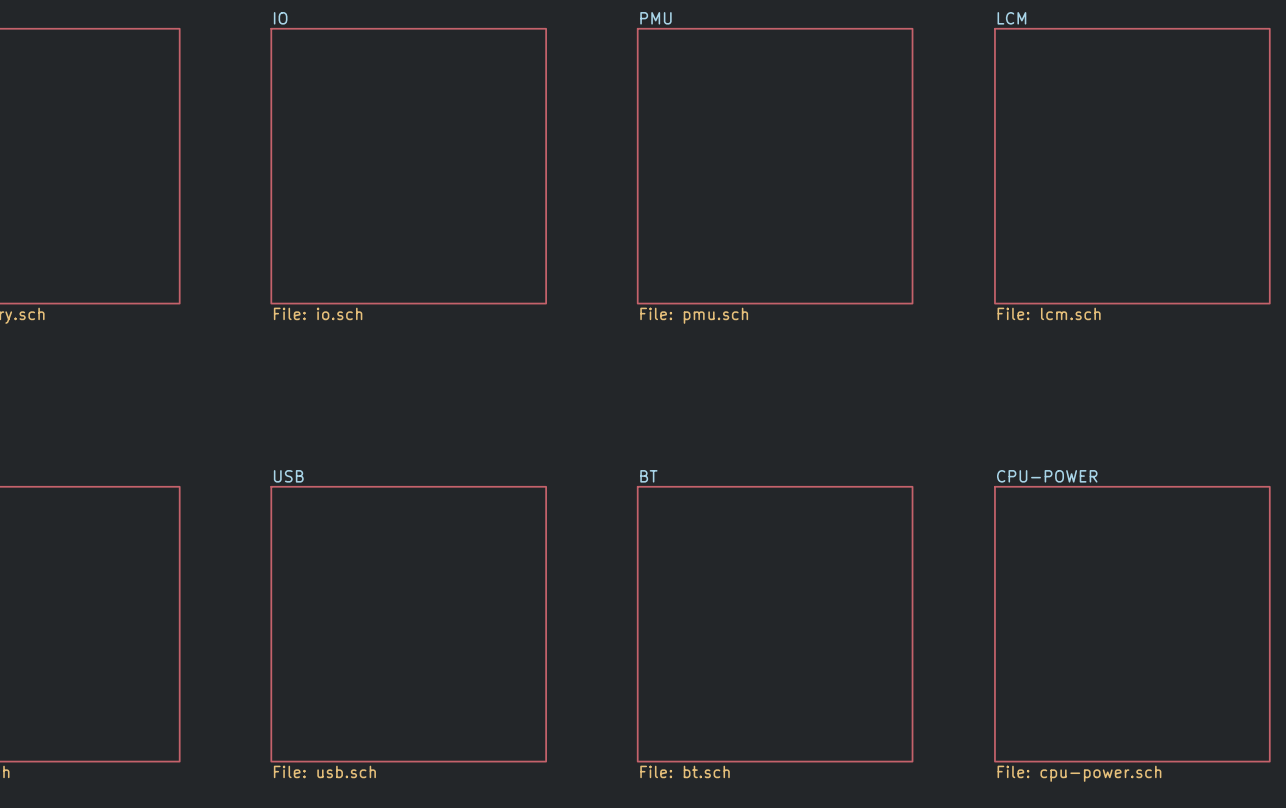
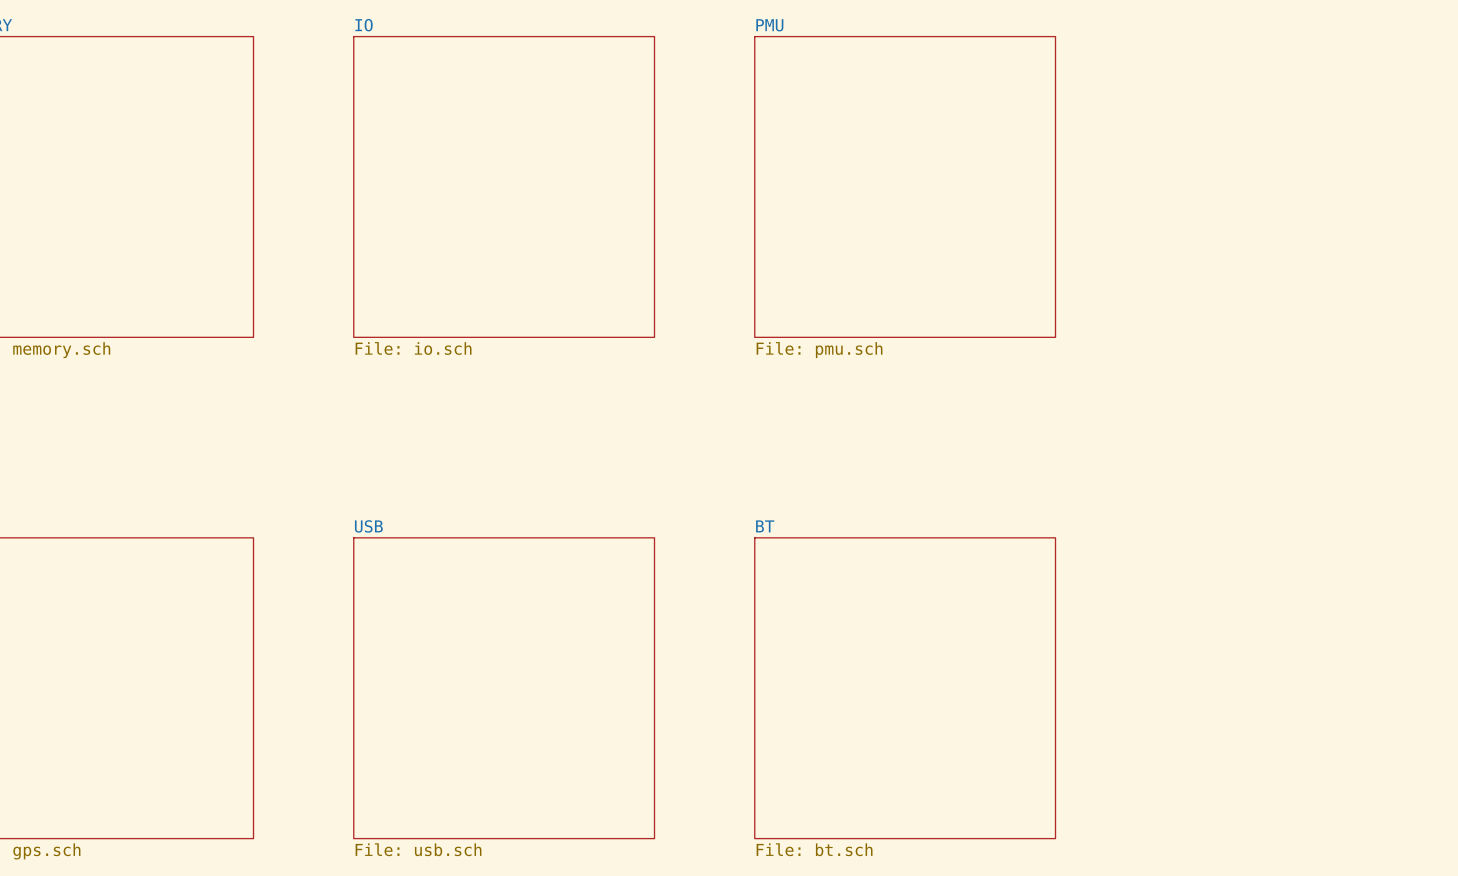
sheet LCM: File: lcm.sch (1132, 166) -> none
sheet CPU-POWER: File: cpu-power.sch (1132, 624) -> none

